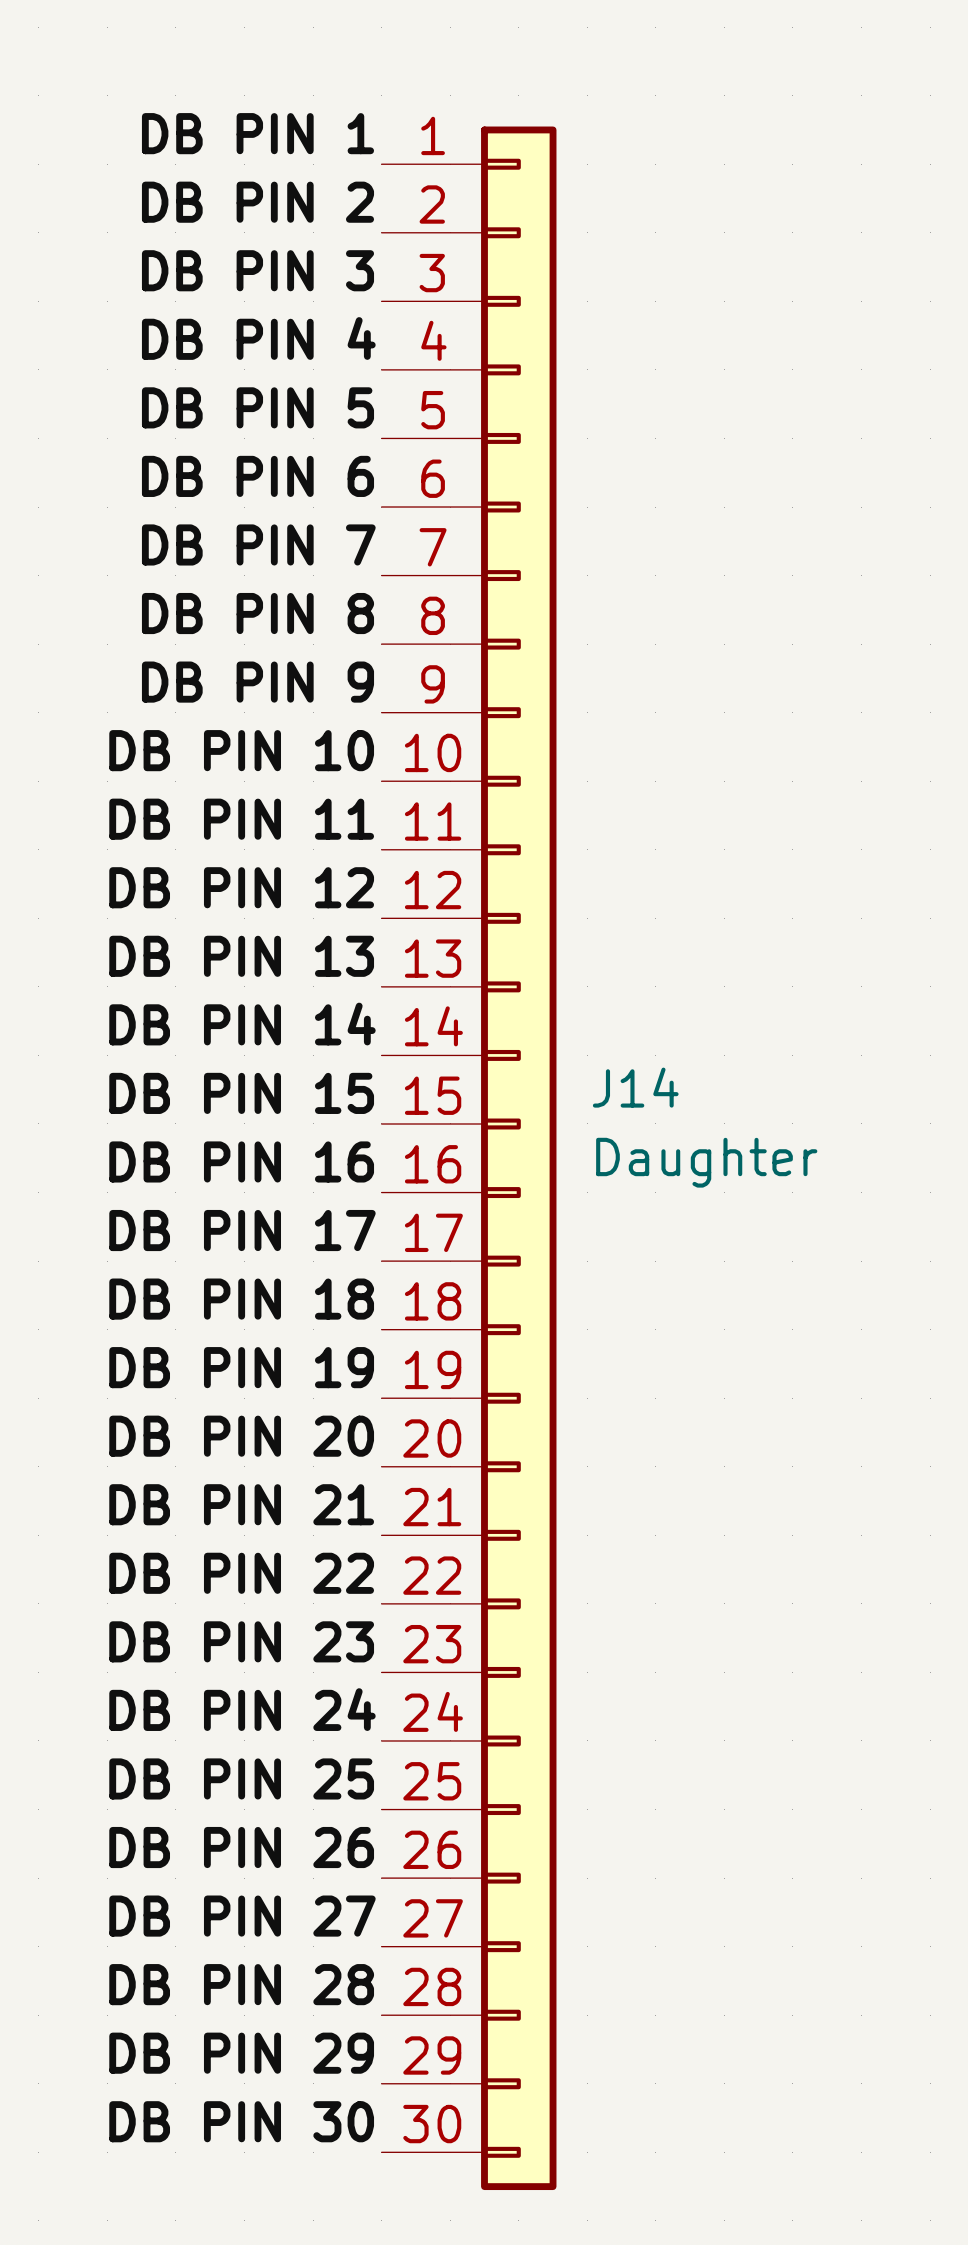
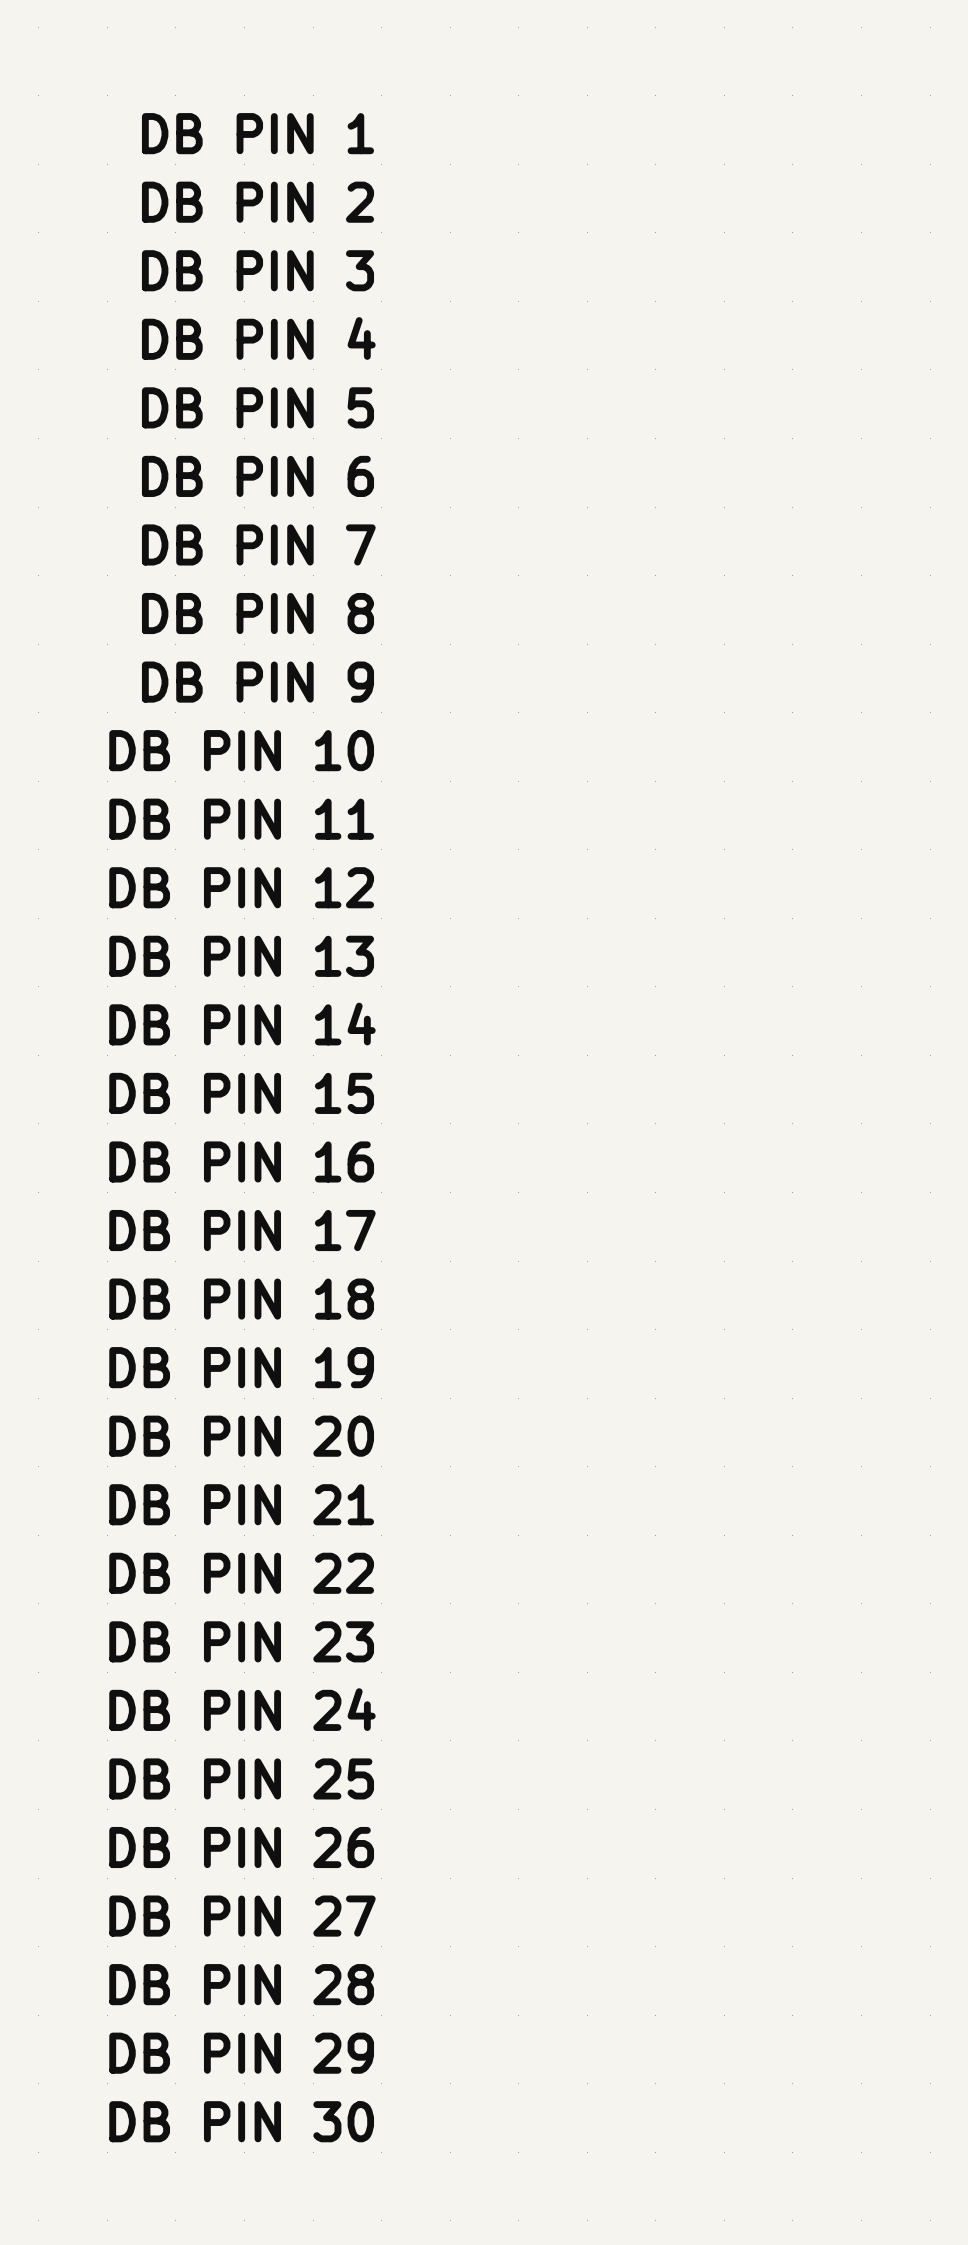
J14: Daughter (469, 1158) -> none

